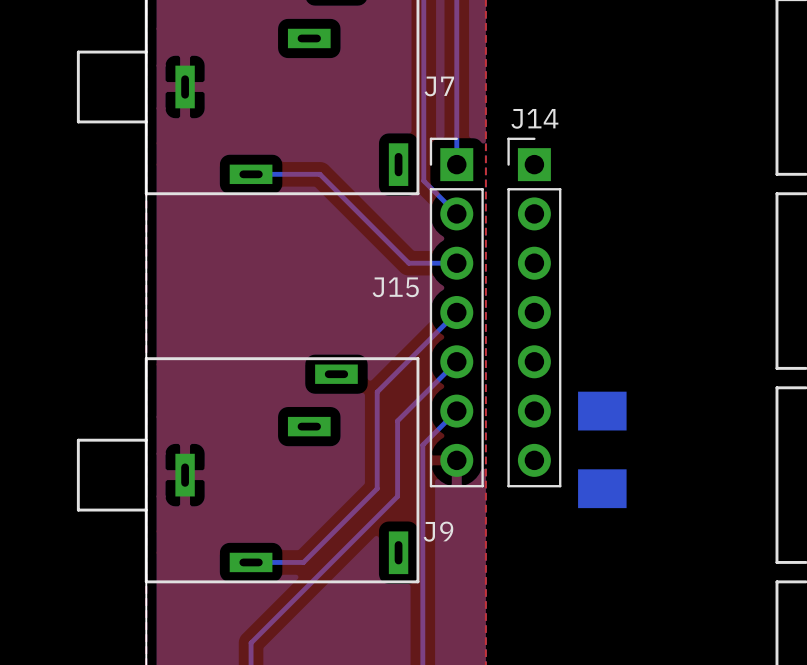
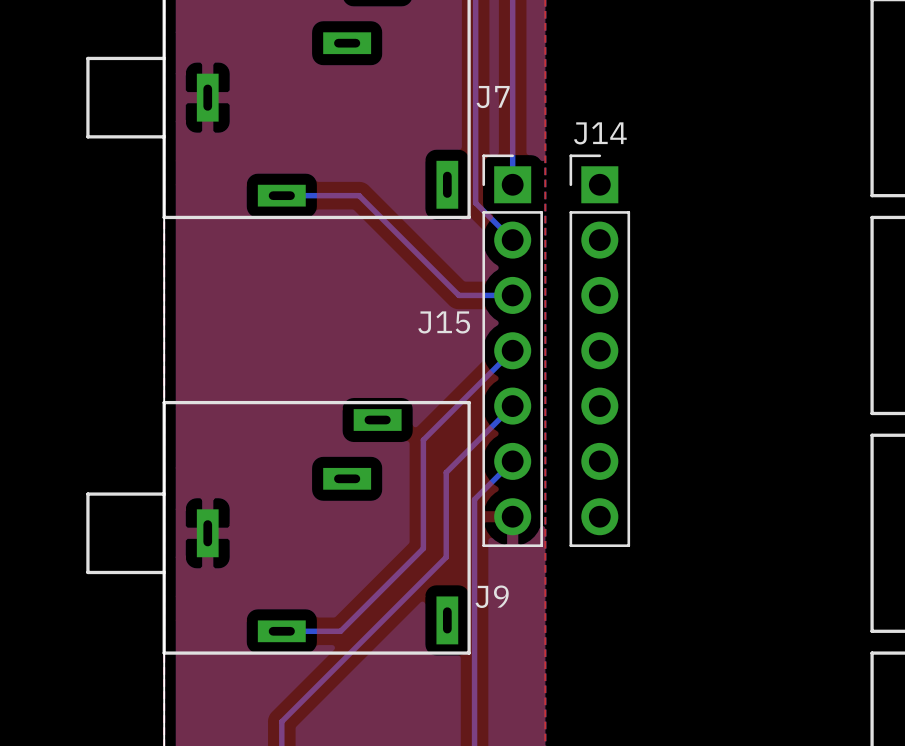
part: (602, 449) -> none

